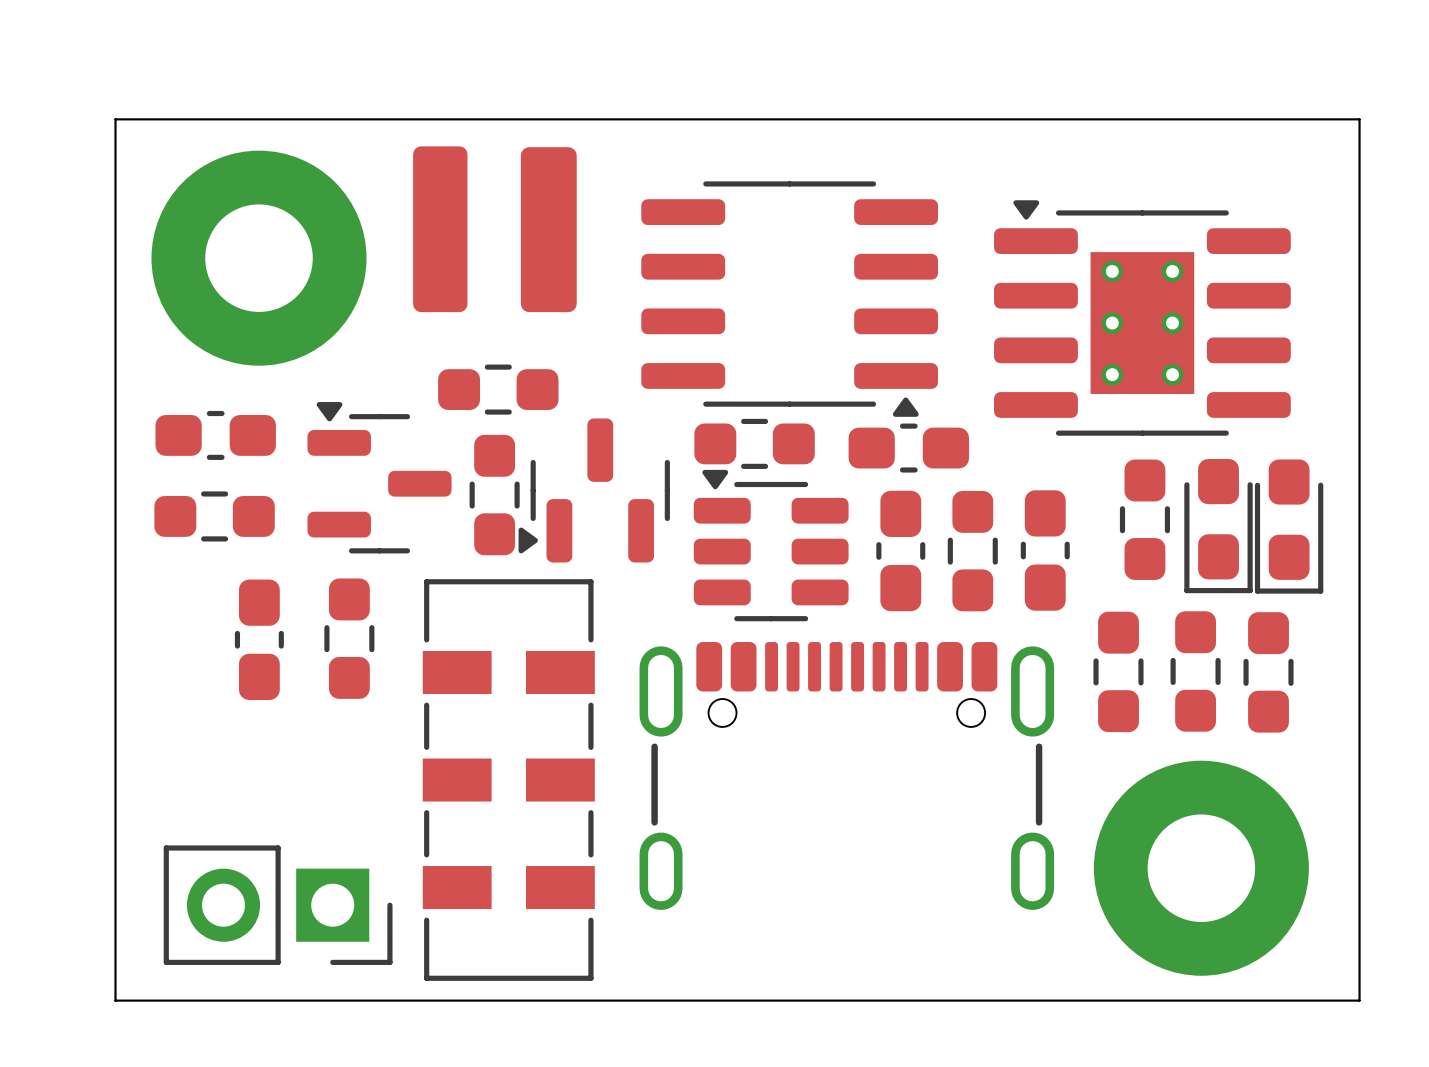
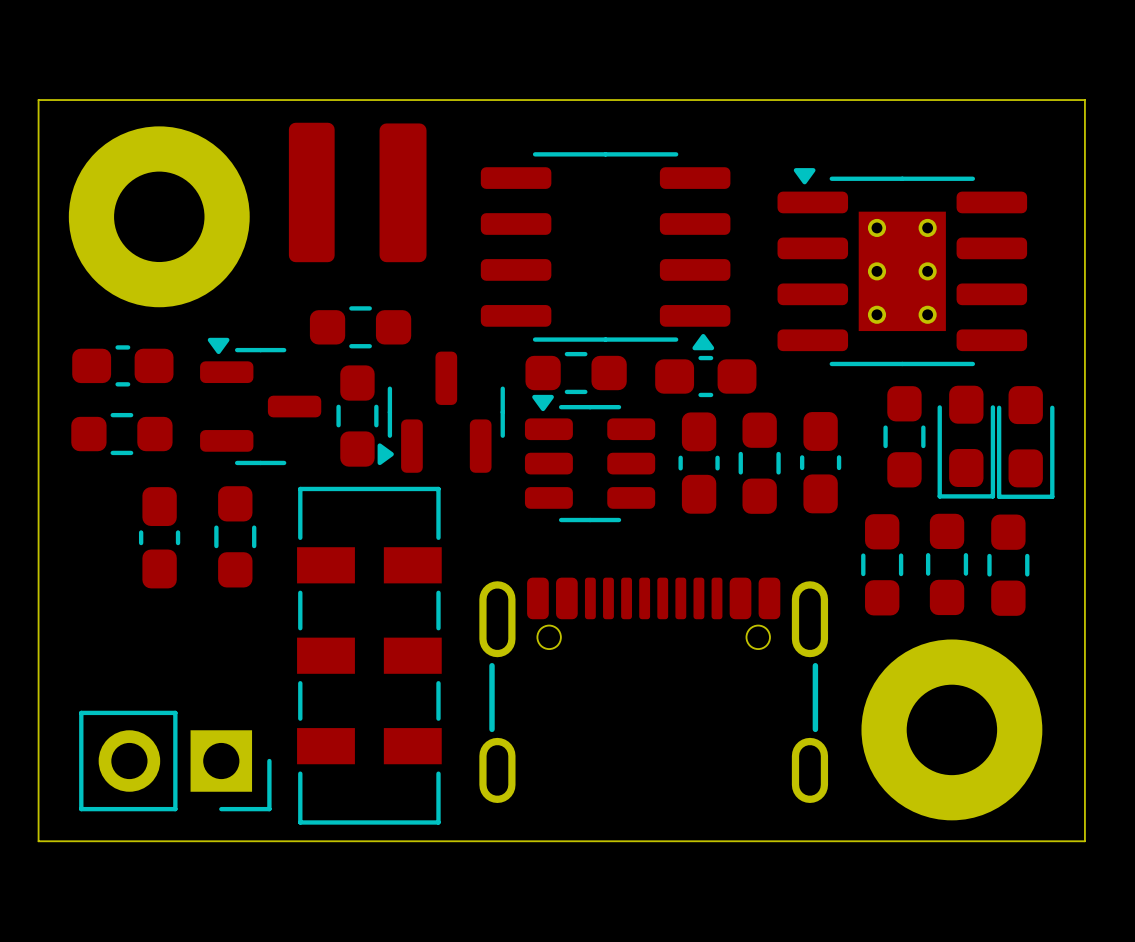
part position: (846, 775) -> (653, 690)

